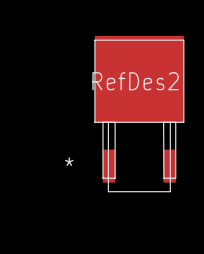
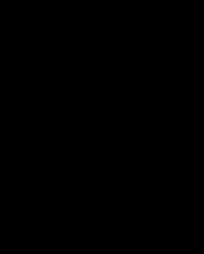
part: (139, 113) -> none

